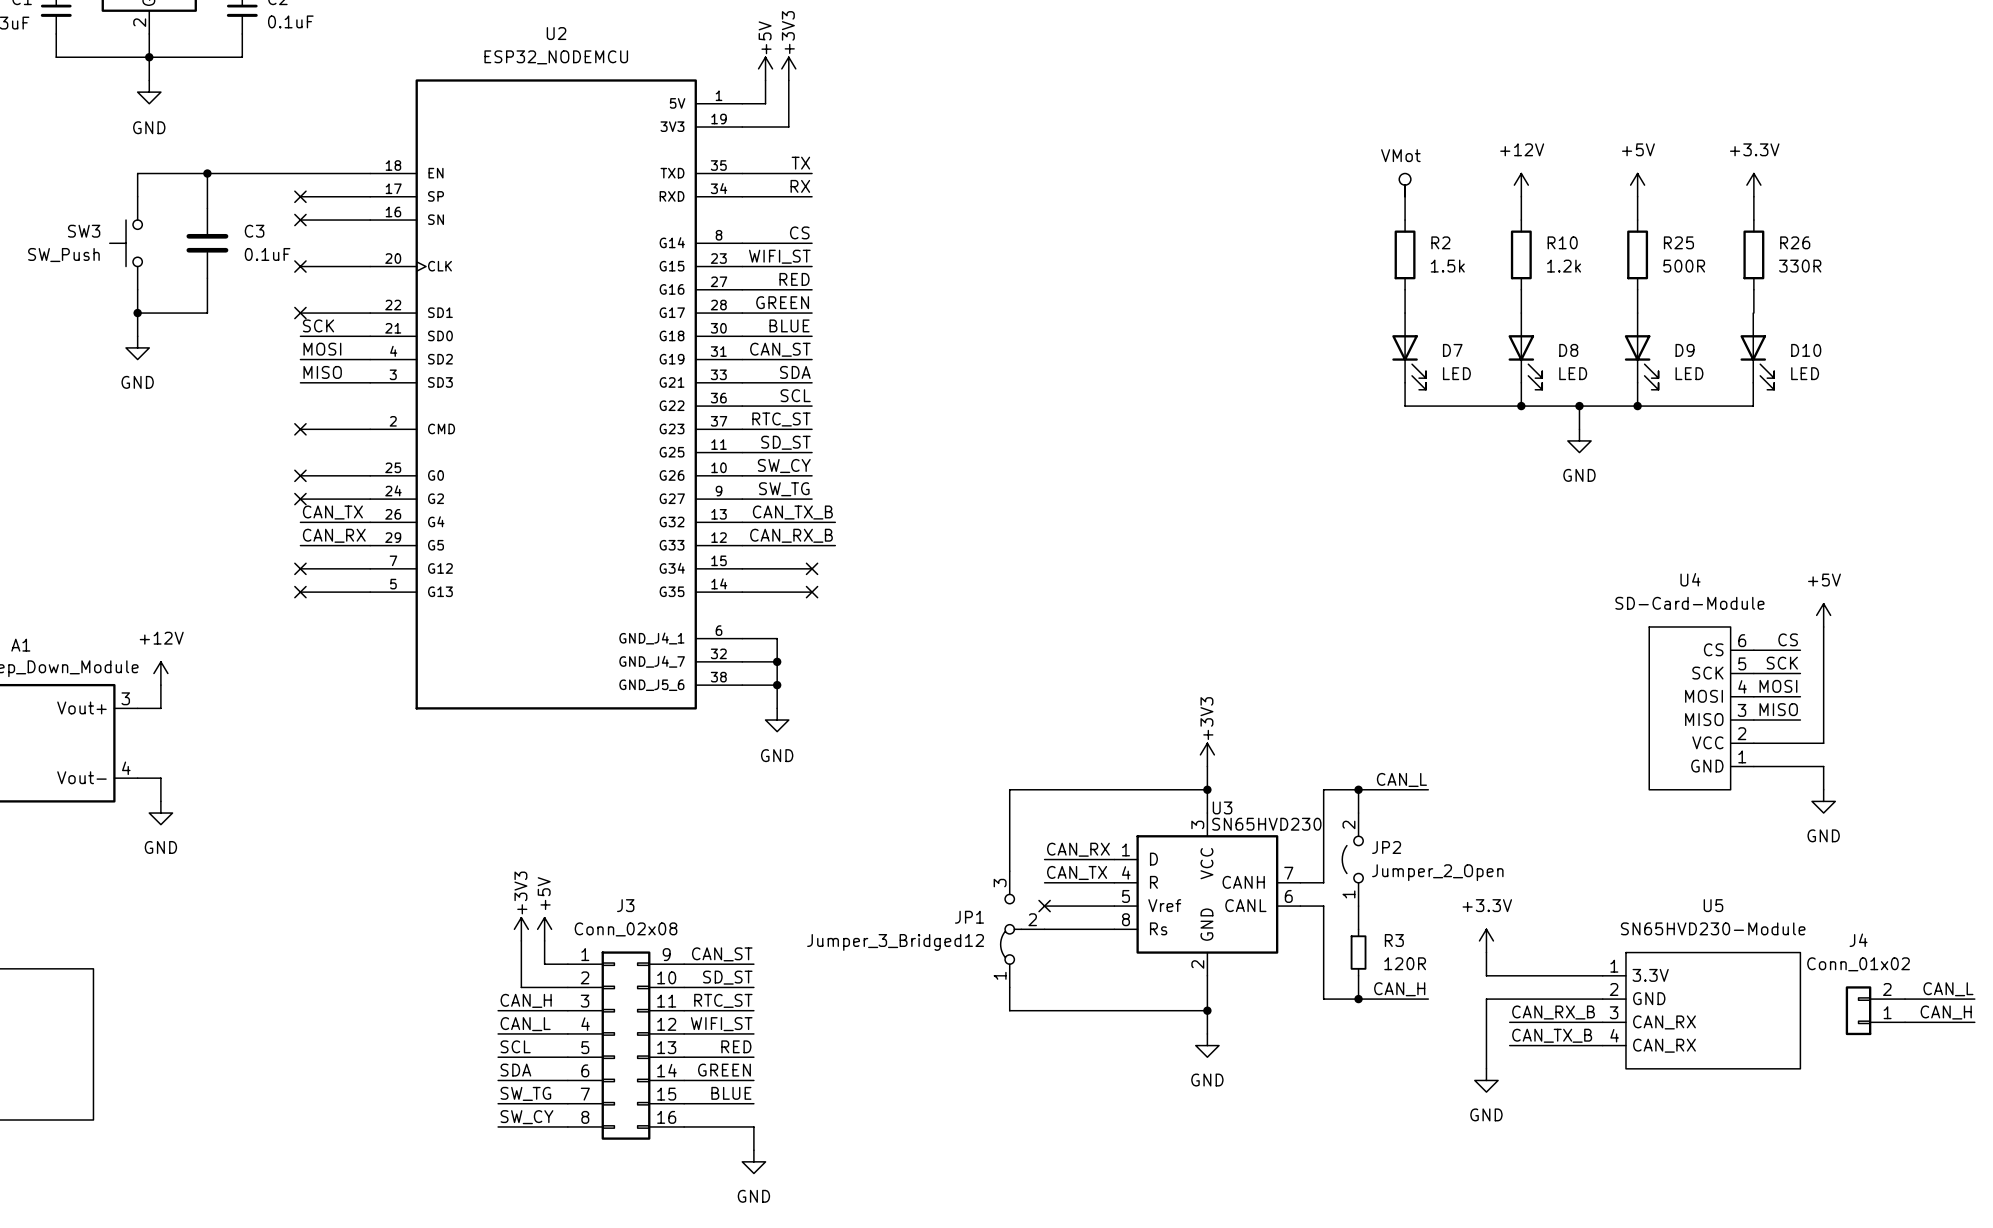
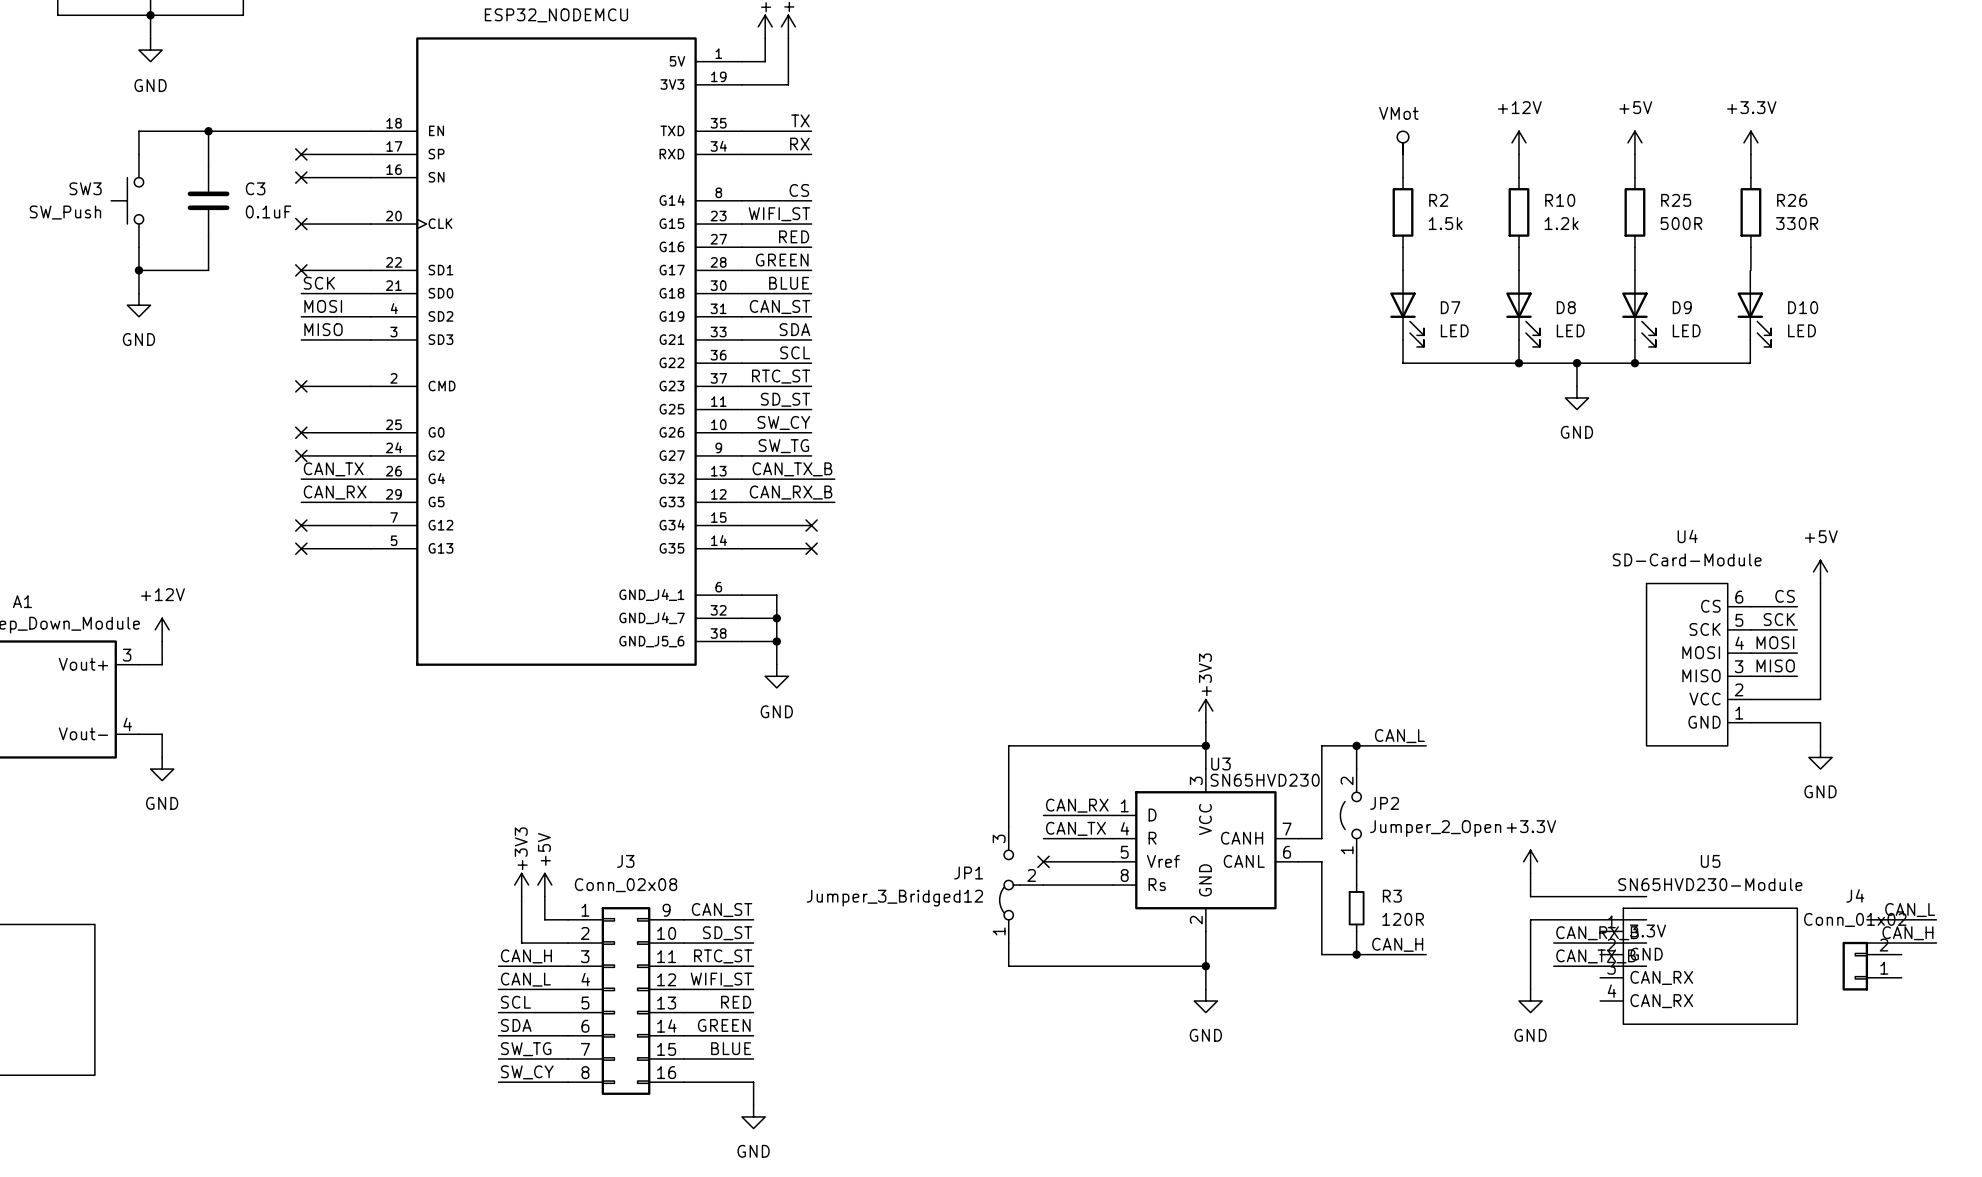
power symbol position: +3.3V (1486, 940) -> +3.3V (1530, 861)
wire: (1486, 952) (1486, 975) (1602, 975) -> (1530, 873) (1530, 896) (1646, 896)
label position: CAN_L (1948, 989) -> CAN_L (1910, 910)
wire: (1602, 999) (1486, 999) (1486, 1068) -> (1646, 919) (1530, 919) (1530, 989)
wire: (1905, 999) (1974, 999) -> (1866, 919) (1936, 919)
label position: CAN_RX_B (1553, 1012) -> CAN_RX_B (1597, 933)
label position: CAN_H (1946, 1012) -> CAN_H (1907, 933)
wire: (1509, 1022) (1602, 1022) -> (1553, 943) (1646, 943)
wire: (1905, 1022) (1974, 1022) -> (1866, 943) (1936, 943)
label position: CAN_TX_B (1552, 1035) -> CAN_TX_B (1596, 956)
wire: (1509, 1045) (1602, 1045) -> (1553, 966) (1646, 966)
power symbol position: GND (1486, 1080) -> GND (1530, 1001)

